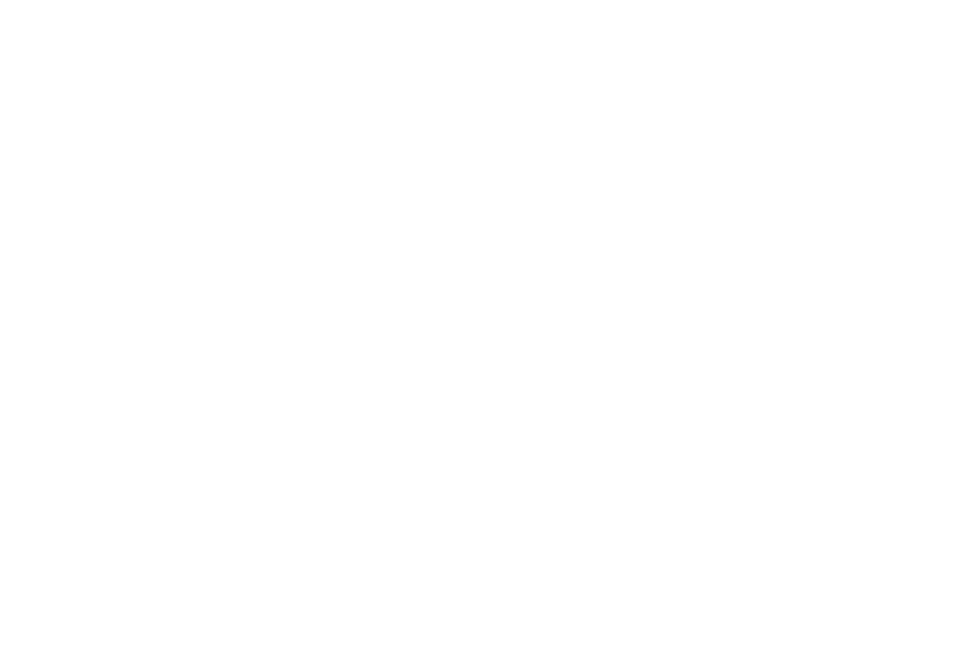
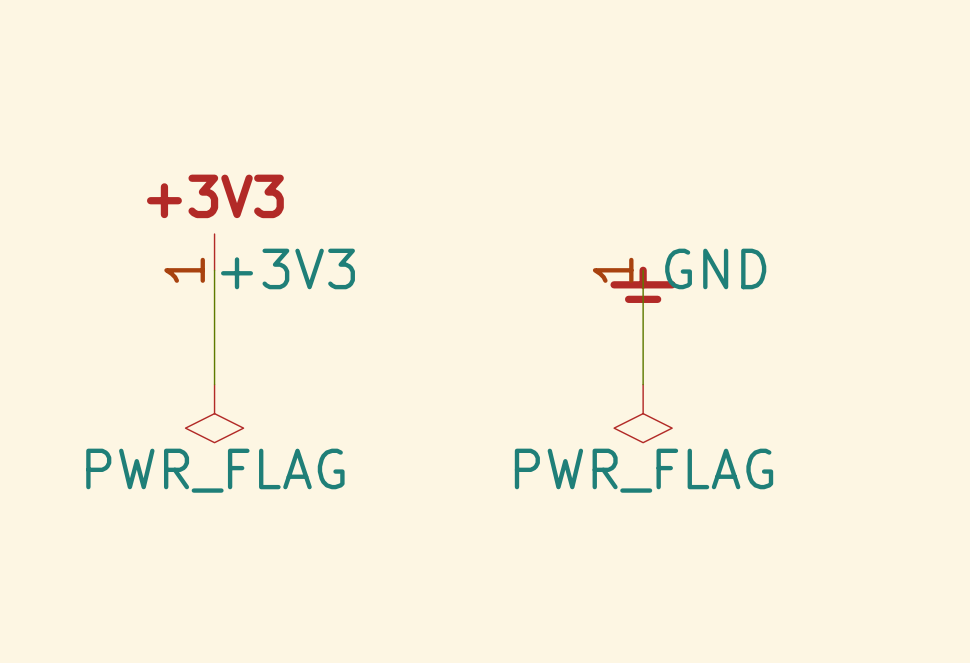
power symbol: none -> +3V3 (214, 252)
wire: none -> (214, 270) (214, 384)
wire: none -> (643, 270) (643, 384)
power symbol: none -> GND (643, 284)
power symbol: none -> PWR_FLAG (214, 413)
power symbol: none -> PWR_FLAG (643, 413)

